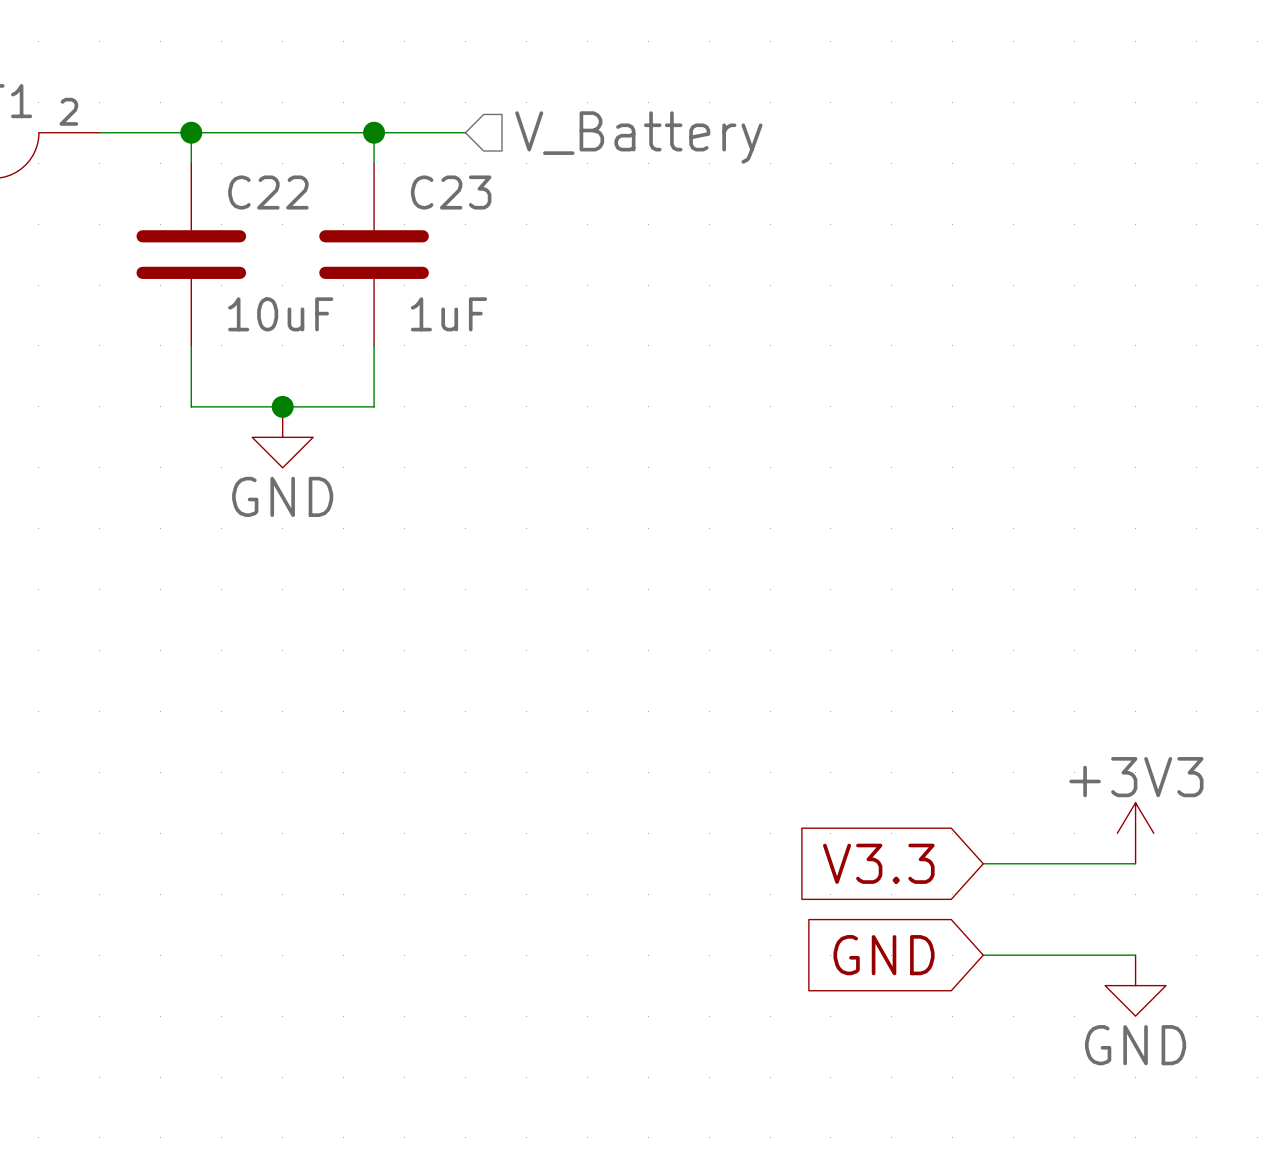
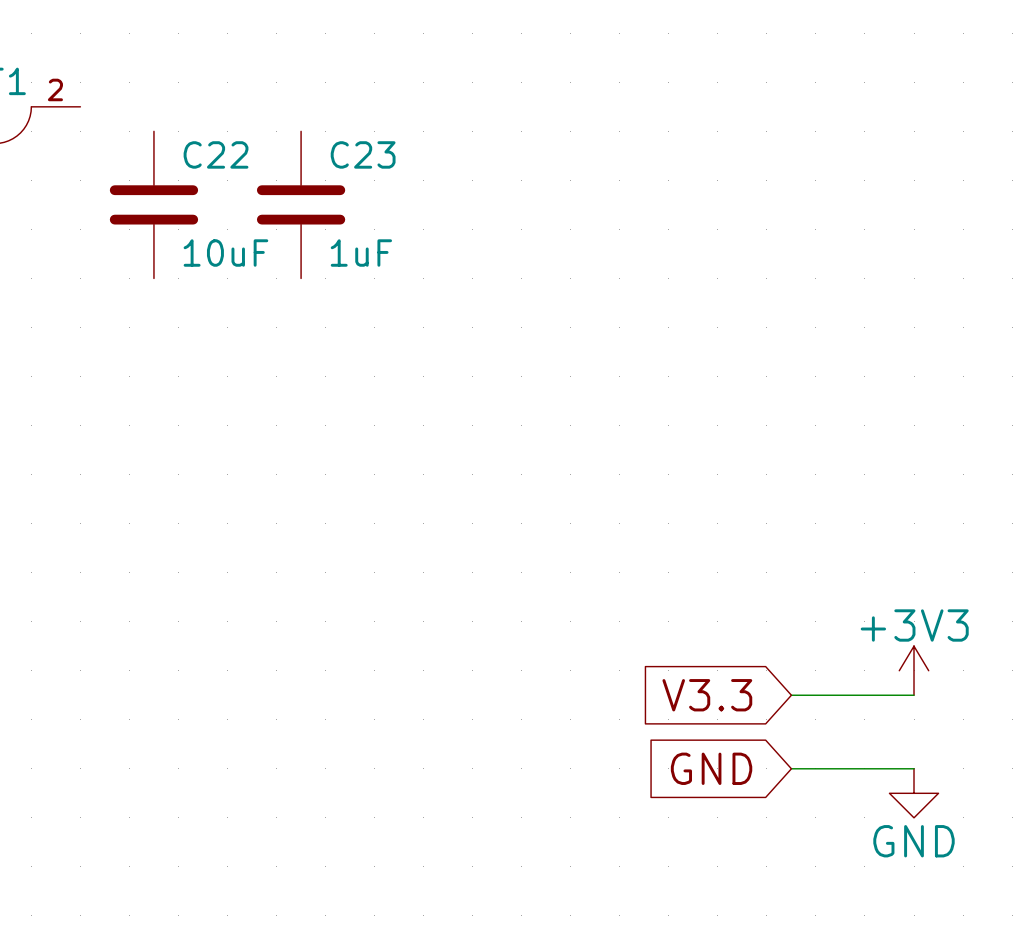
wire: (99, 132) (465, 132) -> none
wire: (191, 132) (191, 163) -> none
junction: (191, 132) -> none
wire: (374, 132) (374, 163) -> none
junction: (374, 132) -> none
hierarchical label: V_Battery (638, 137) -> none
wire: (191, 345) (191, 406) (374, 406) (374, 345) -> none
junction: (282, 406) -> none
power symbol: GND (282, 437) -> none

